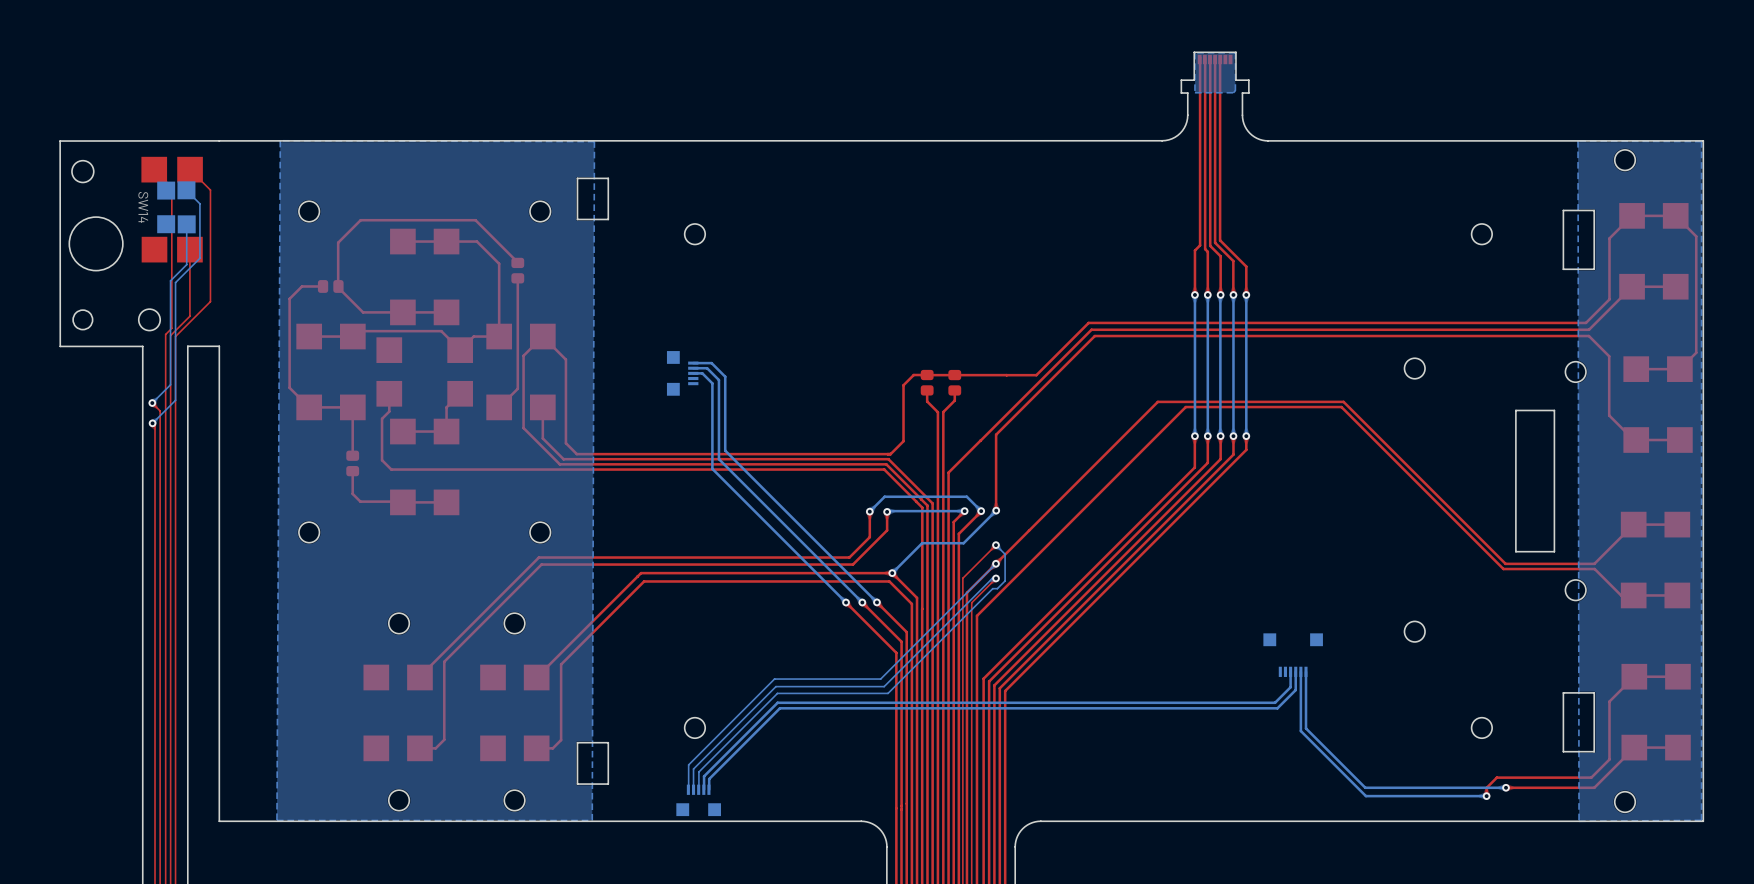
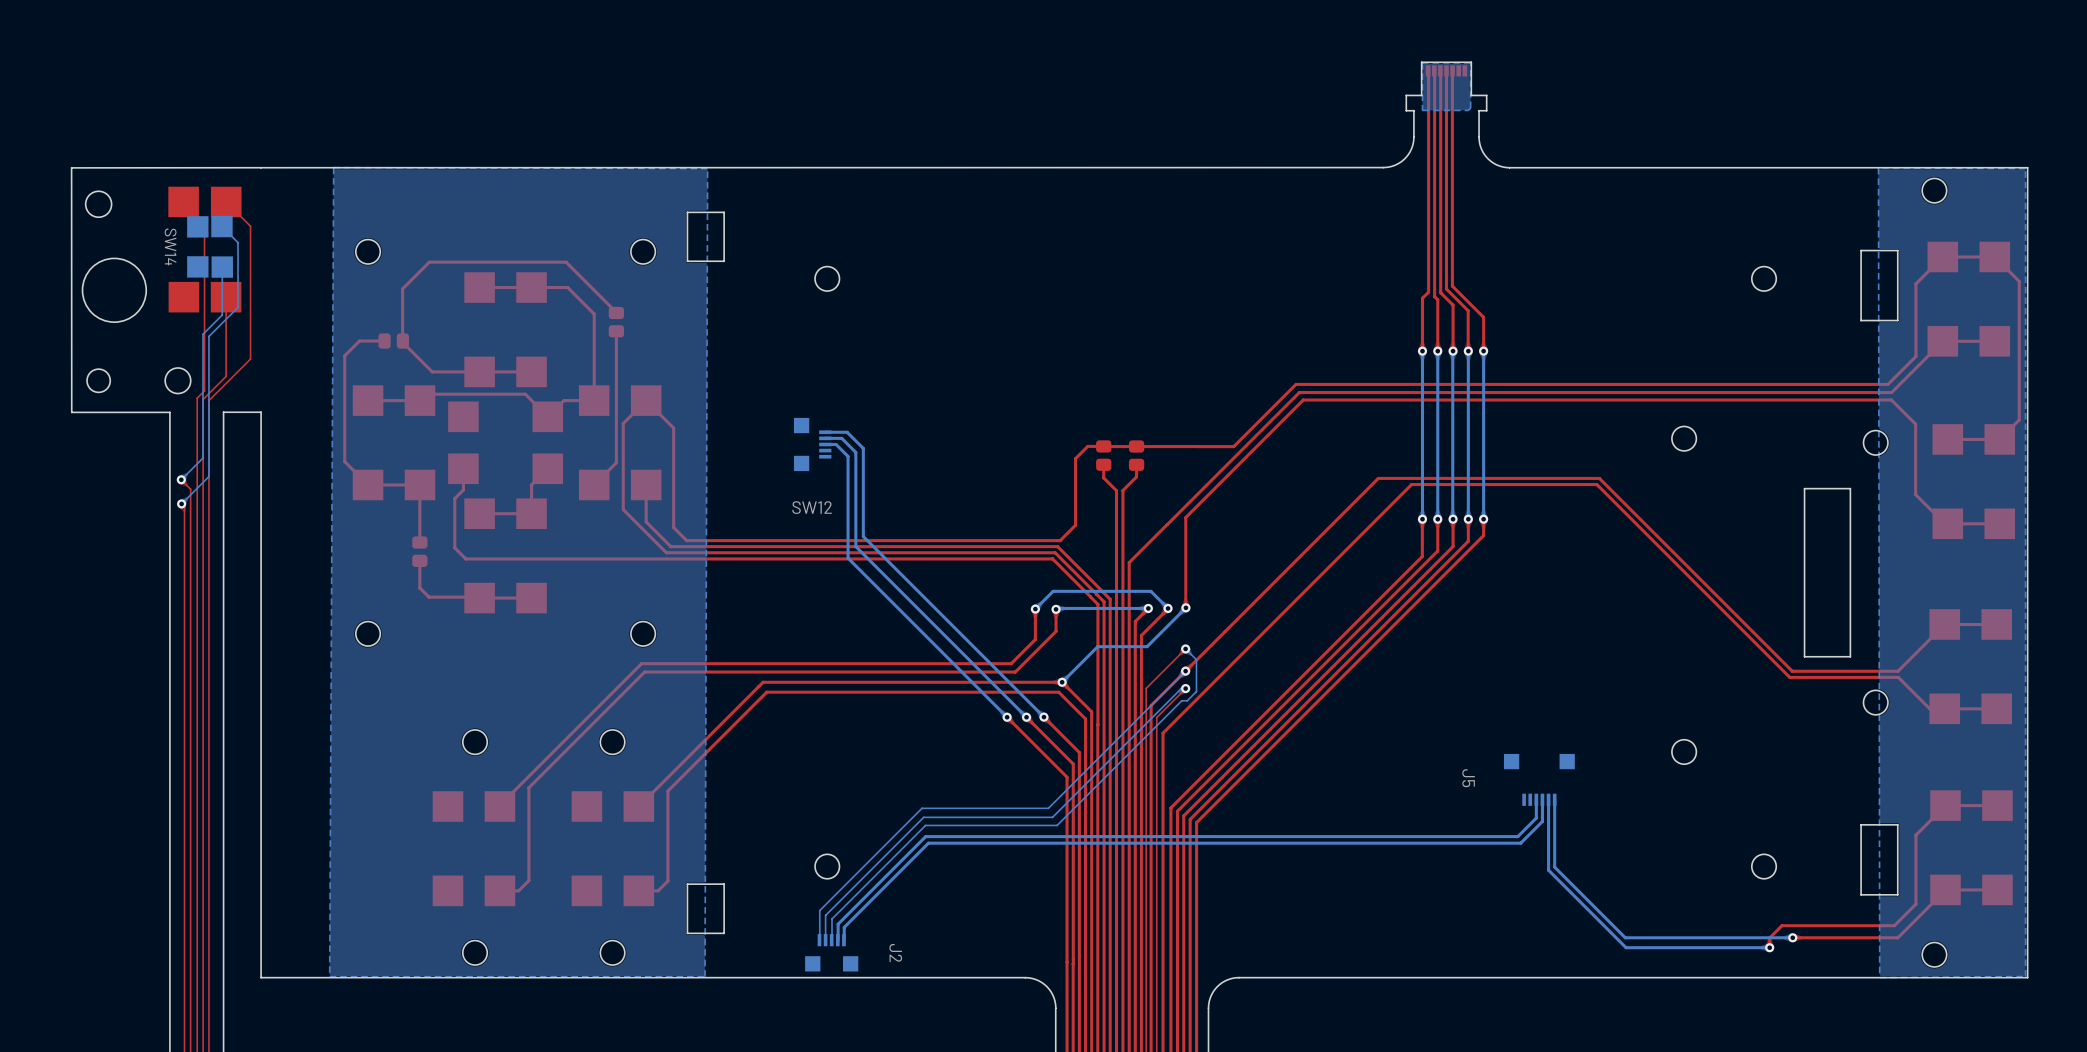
SW12 name: none -> SW12 (812, 507)
J5 name: none -> J5 (1468, 778)
J2 name: none -> J2 (895, 953)

